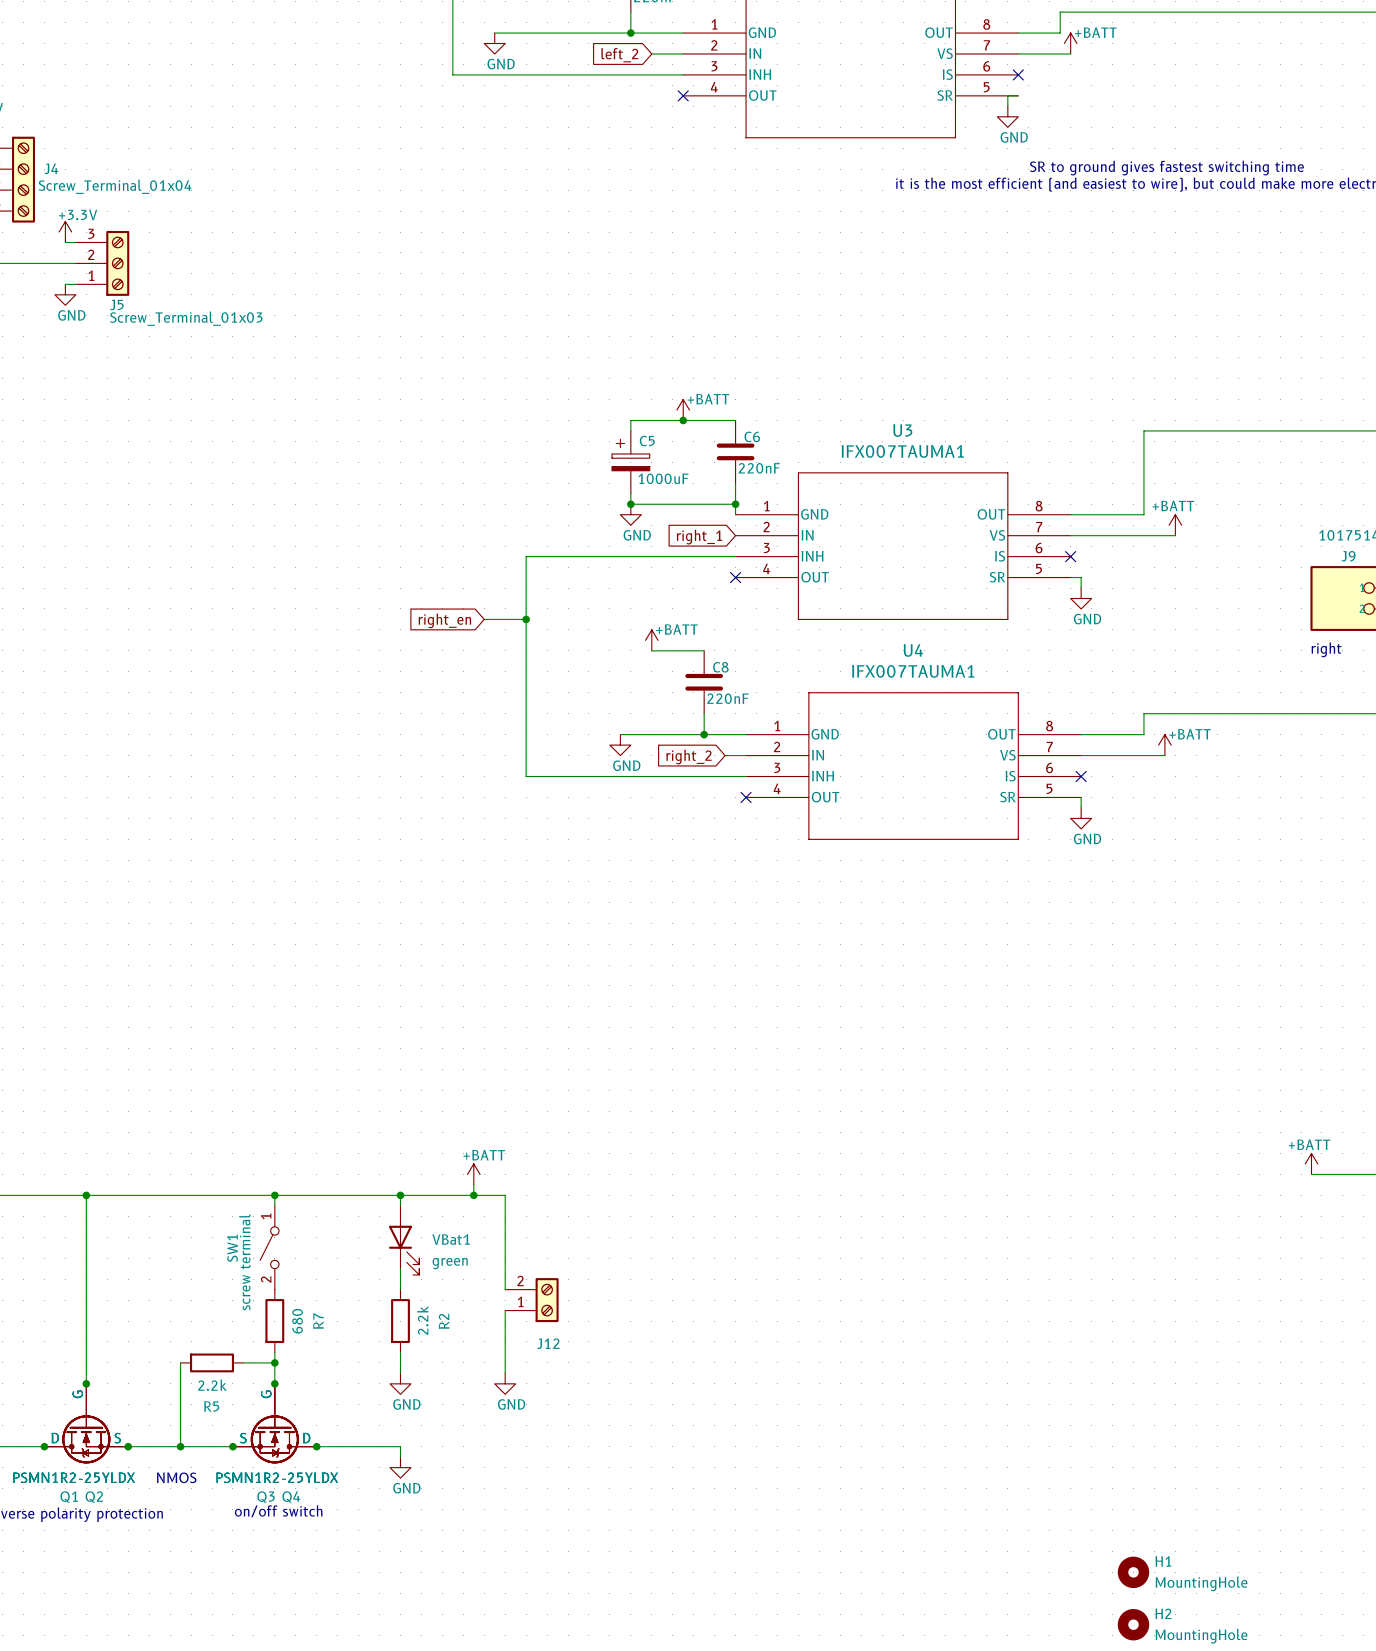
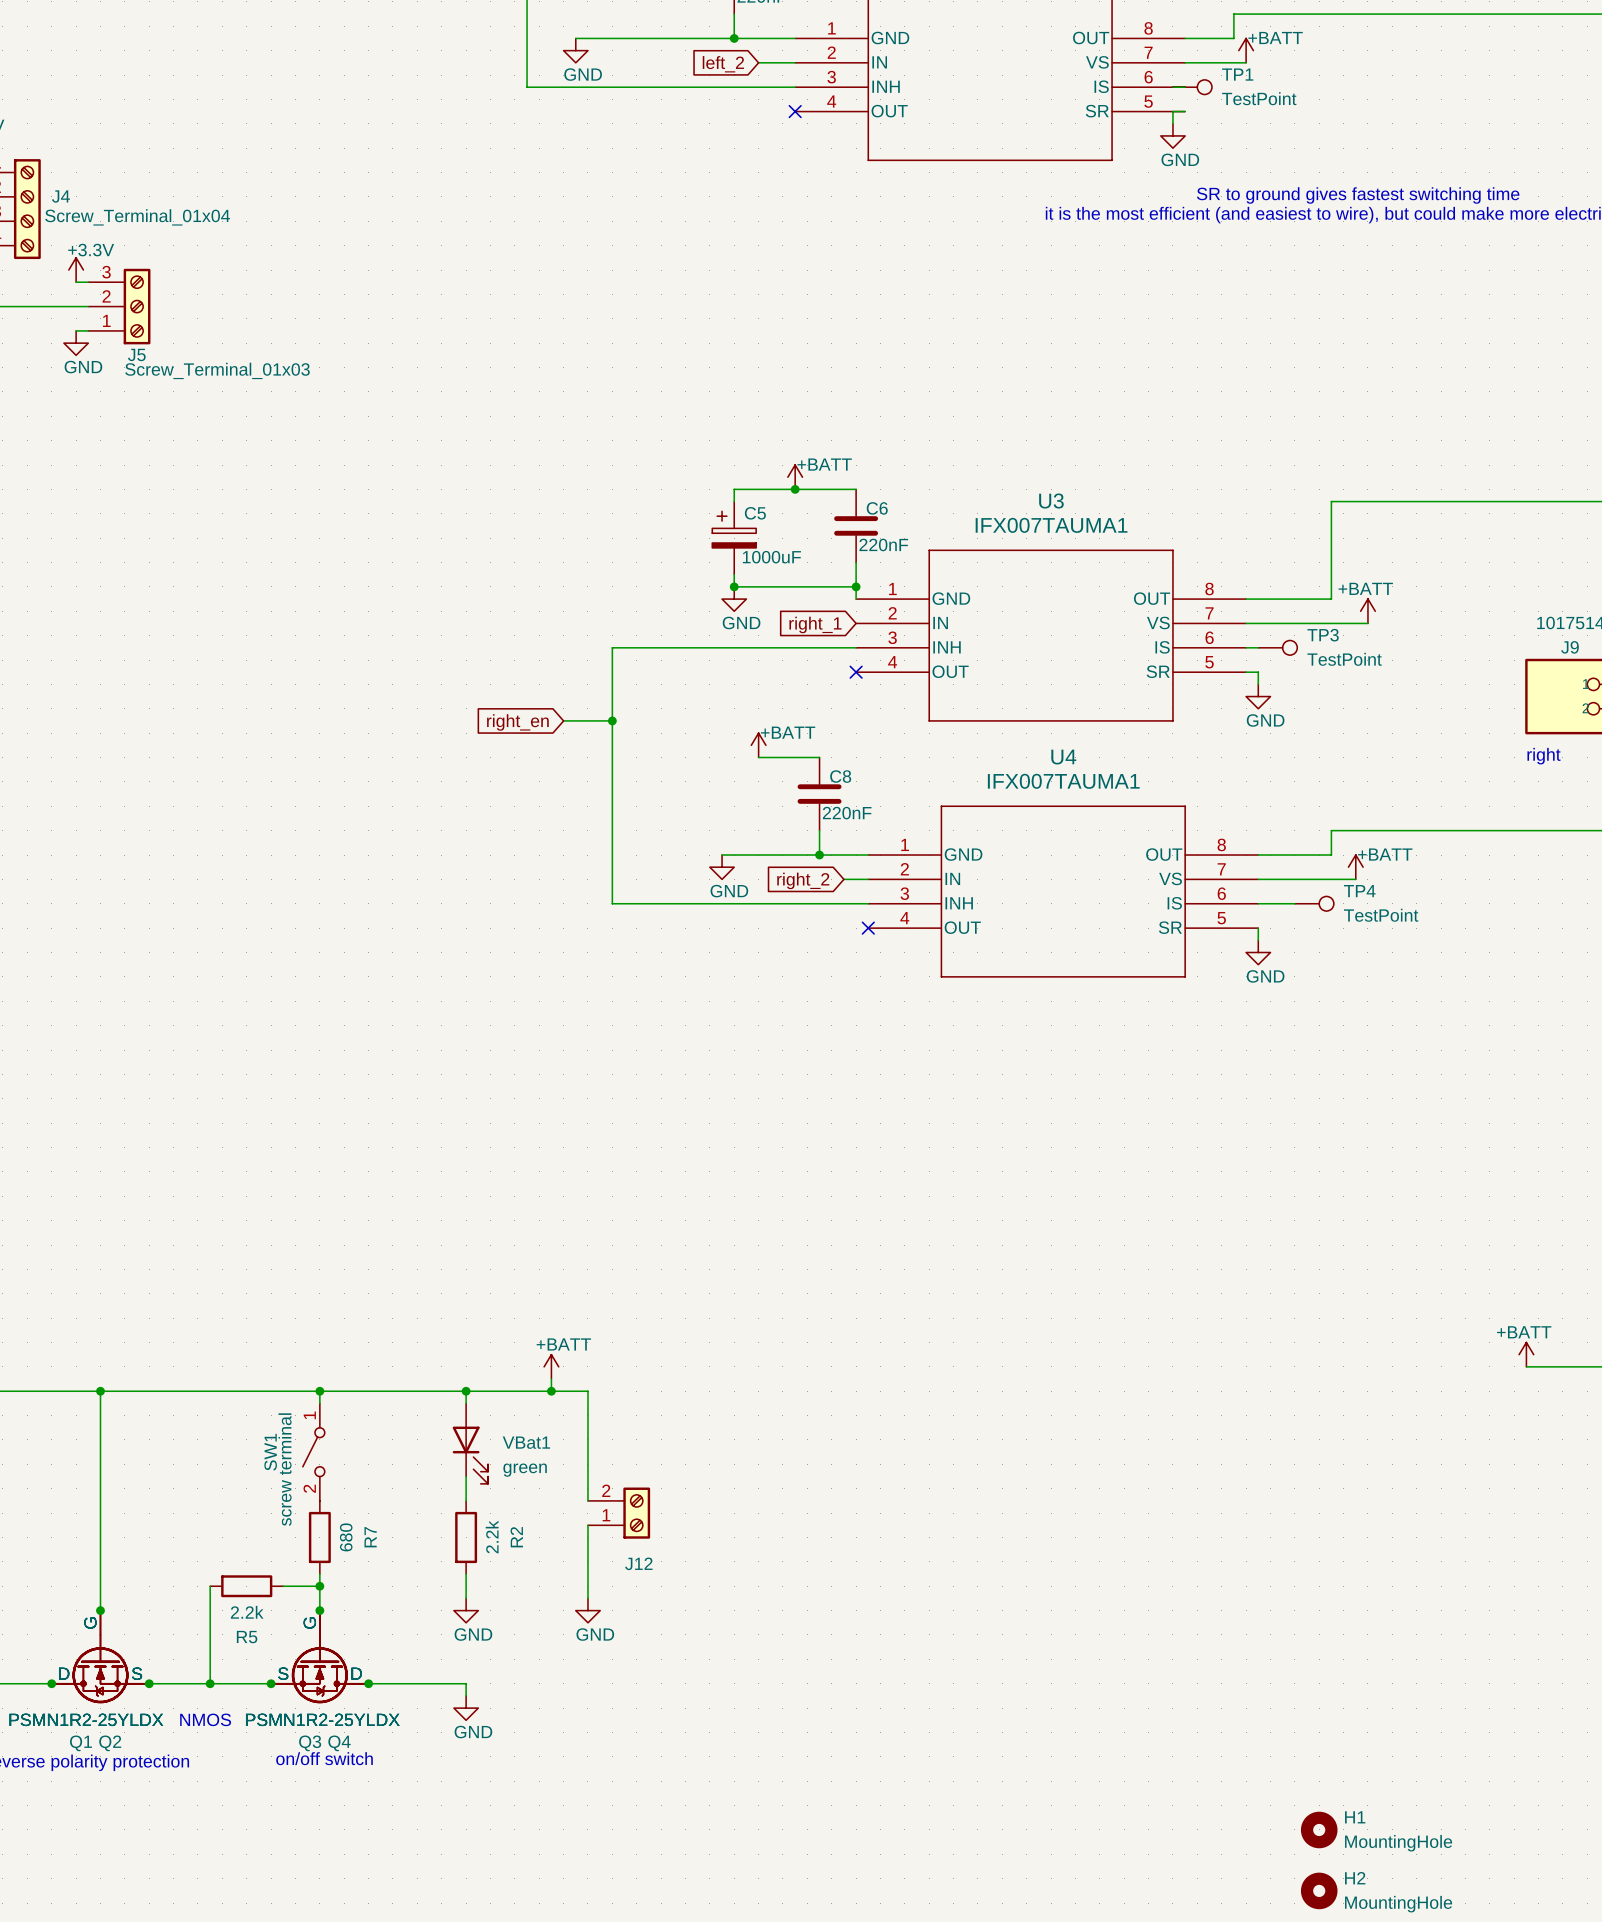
no-connect mark: (1018, 74) -> none
TP1: none -> TestPoint (1192, 87)
wire: none -> (1246, 647) (1258, 647)
no-connect mark: (1070, 556) -> none
TP3: none -> TestPoint (1277, 647)
wire: none -> (1258, 903) (1294, 903)
no-connect mark: (1081, 776) -> none
TP4: none -> TestPoint (1314, 903)

